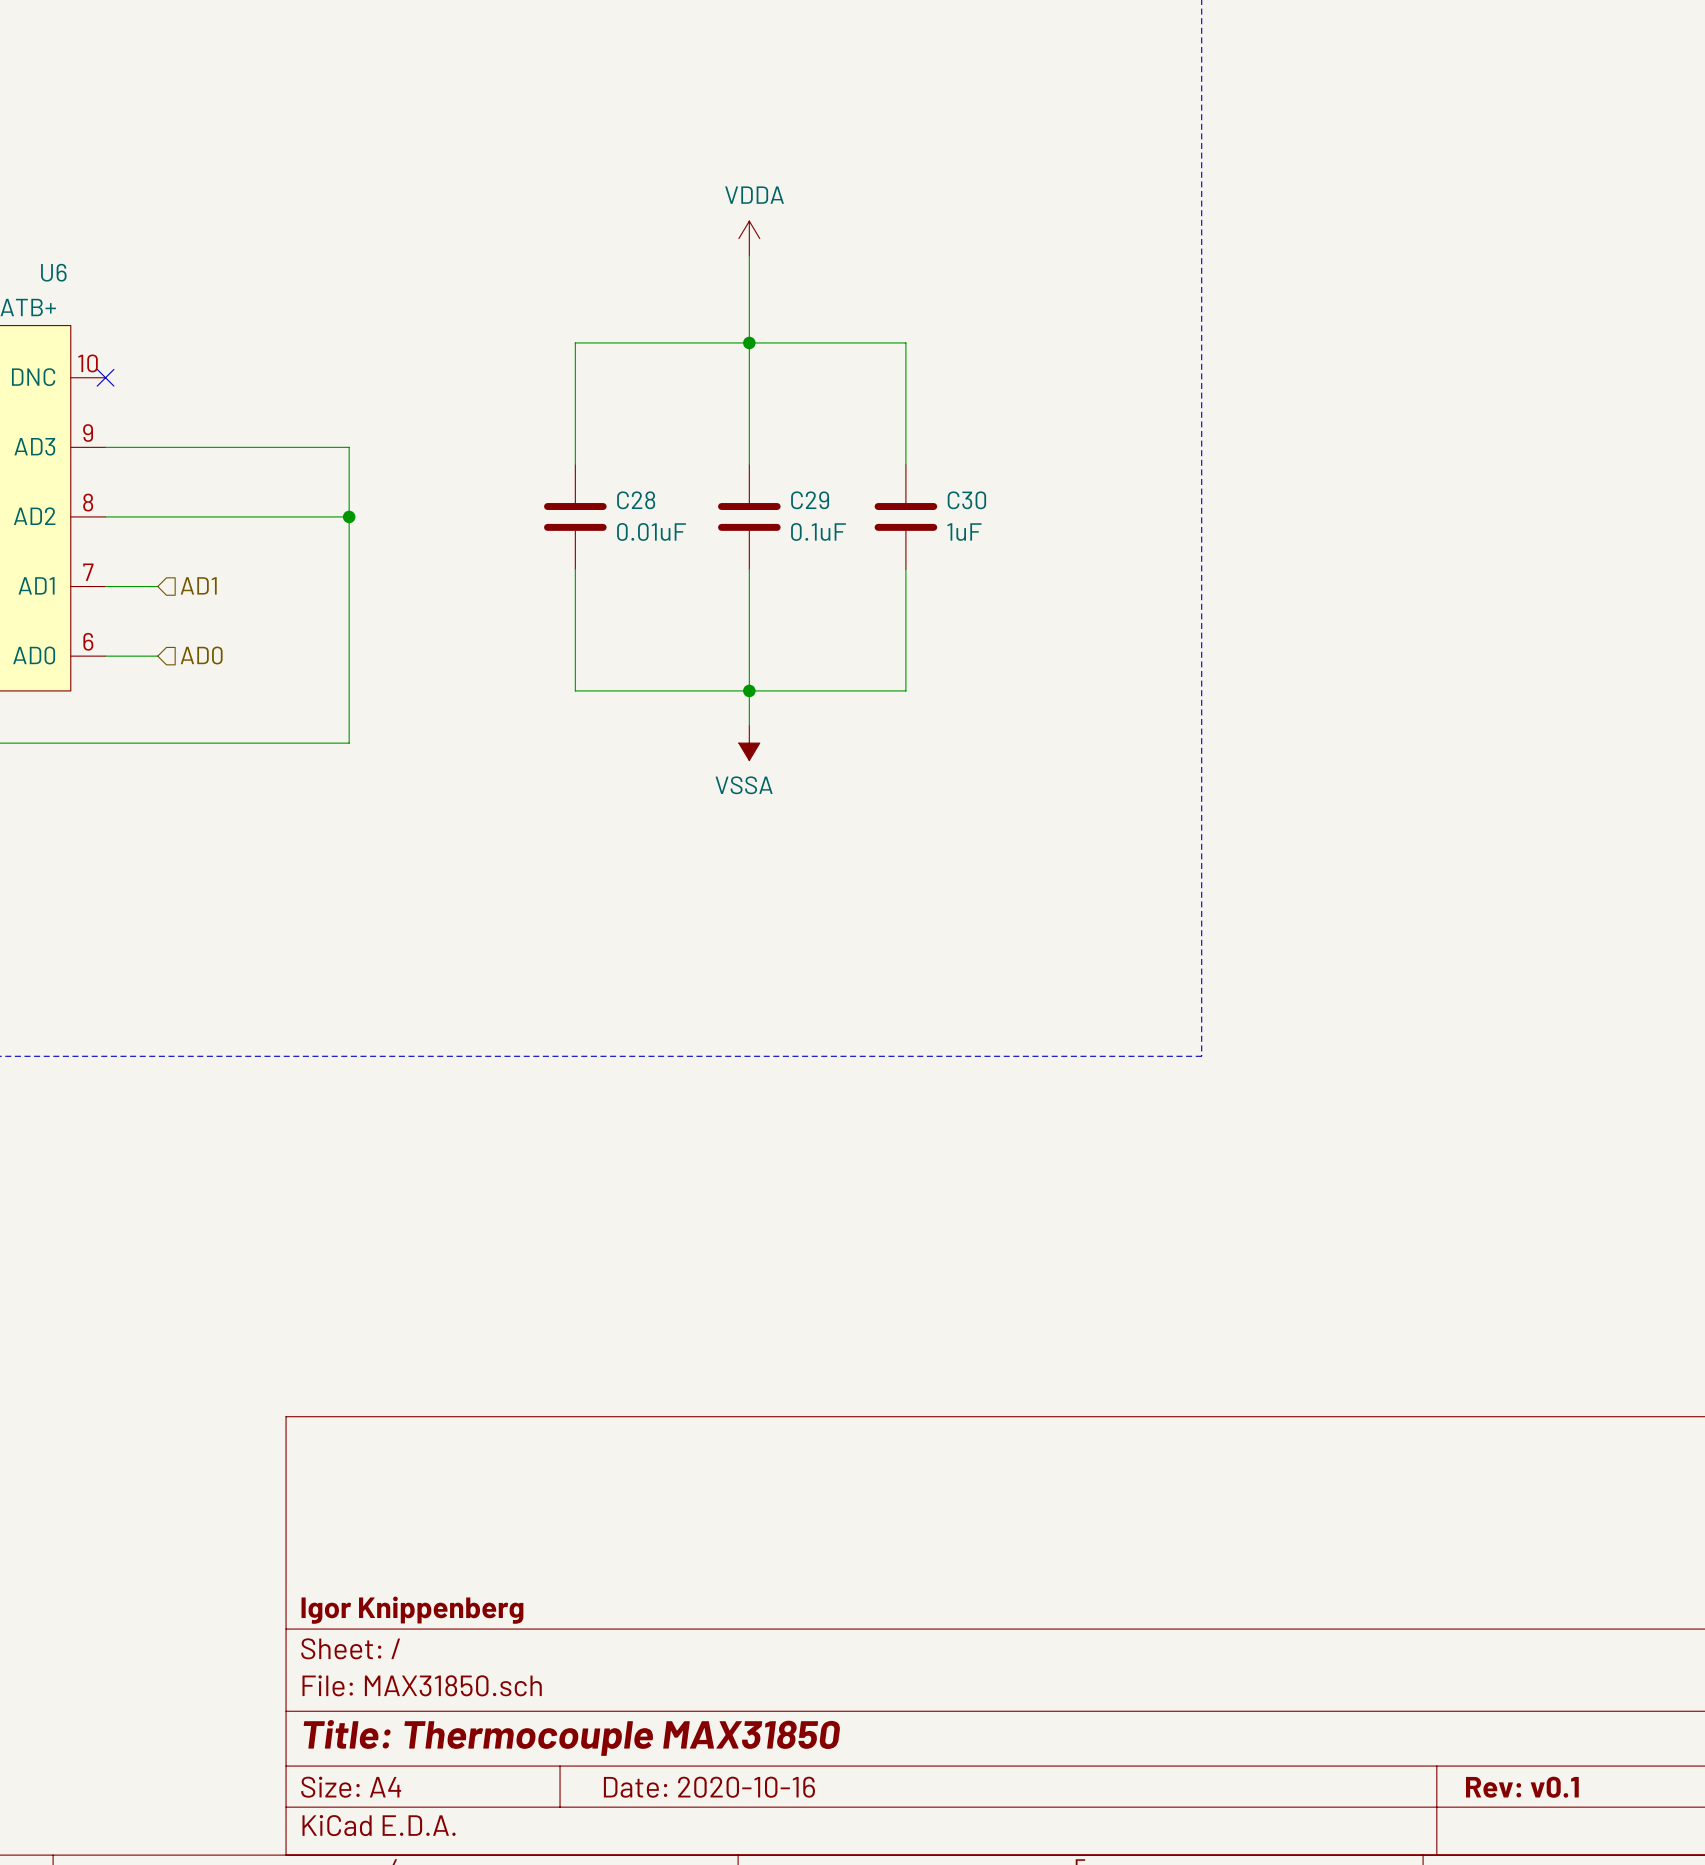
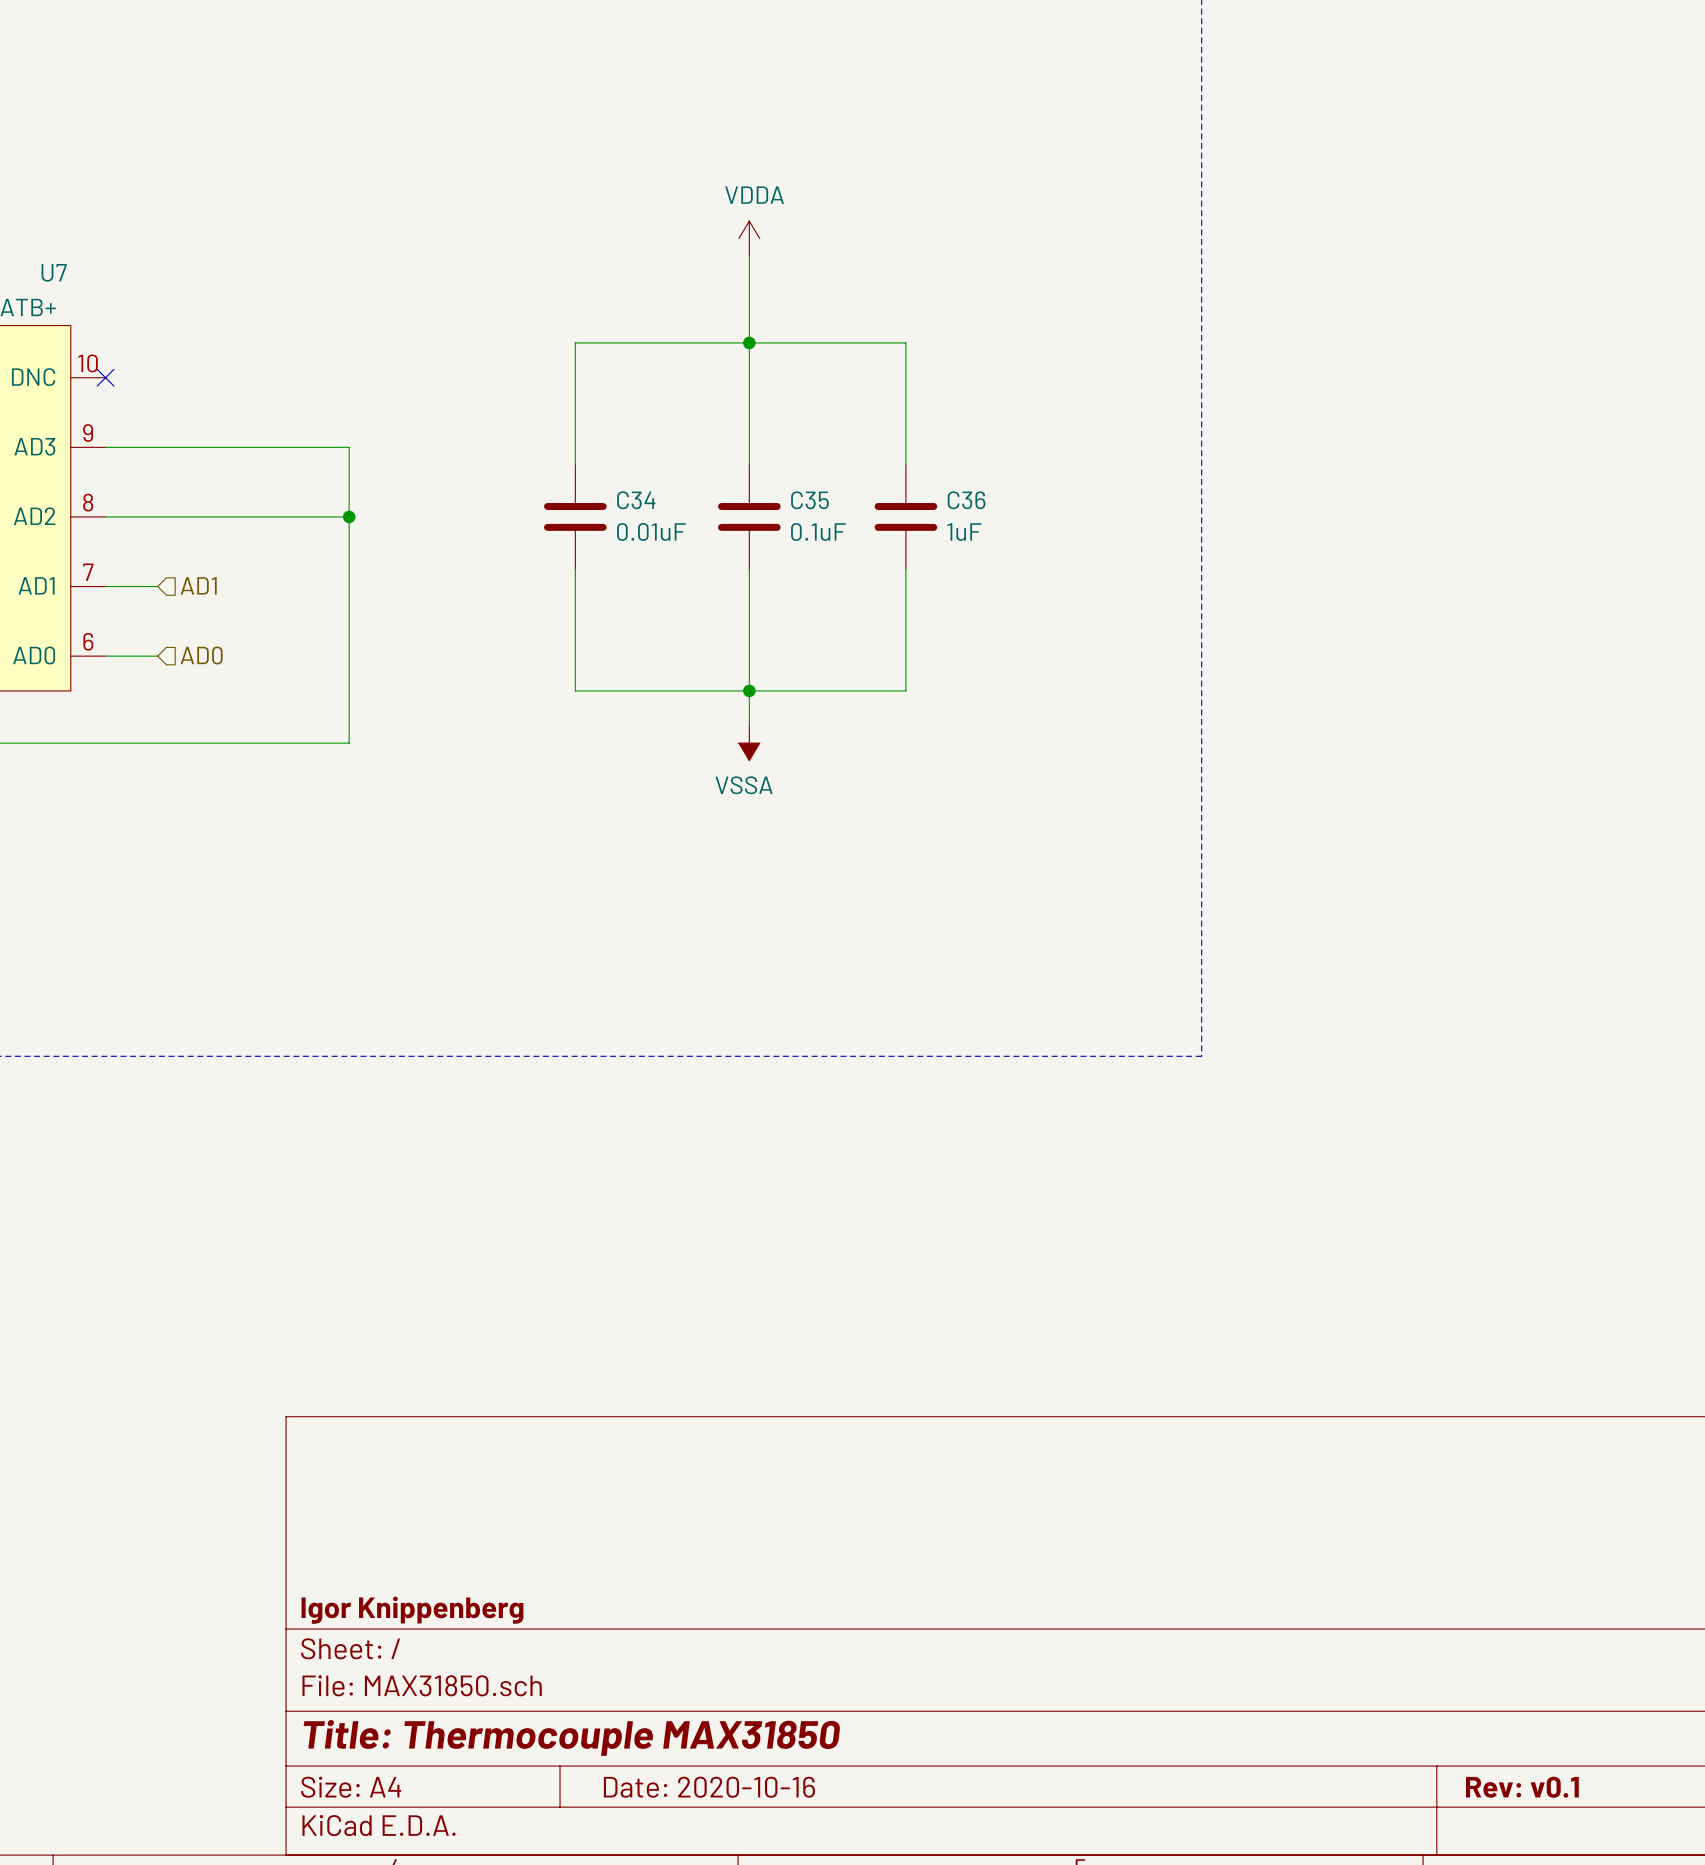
U6 name: U6 (53, 272) -> U7 (54, 272)
C28 name: C28 (636, 500) -> C34 (636, 500)
C29 name: C29 (810, 500) -> C35 (809, 500)
C30 name: C30 (966, 500) -> C36 (966, 500)

